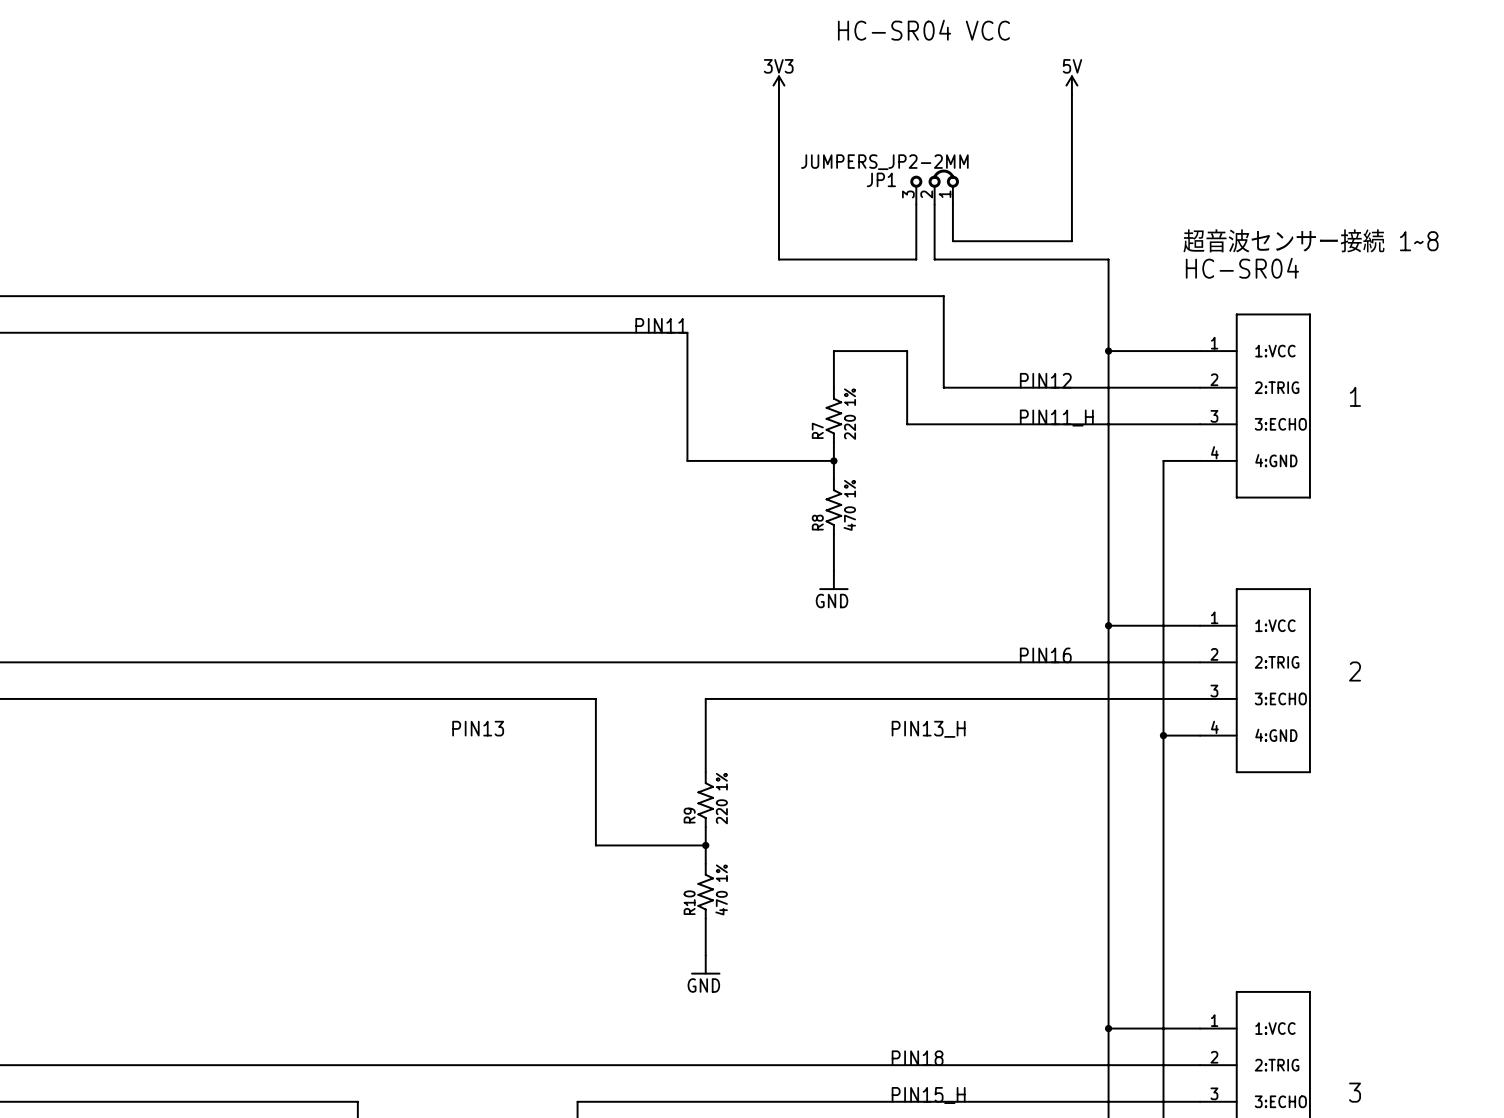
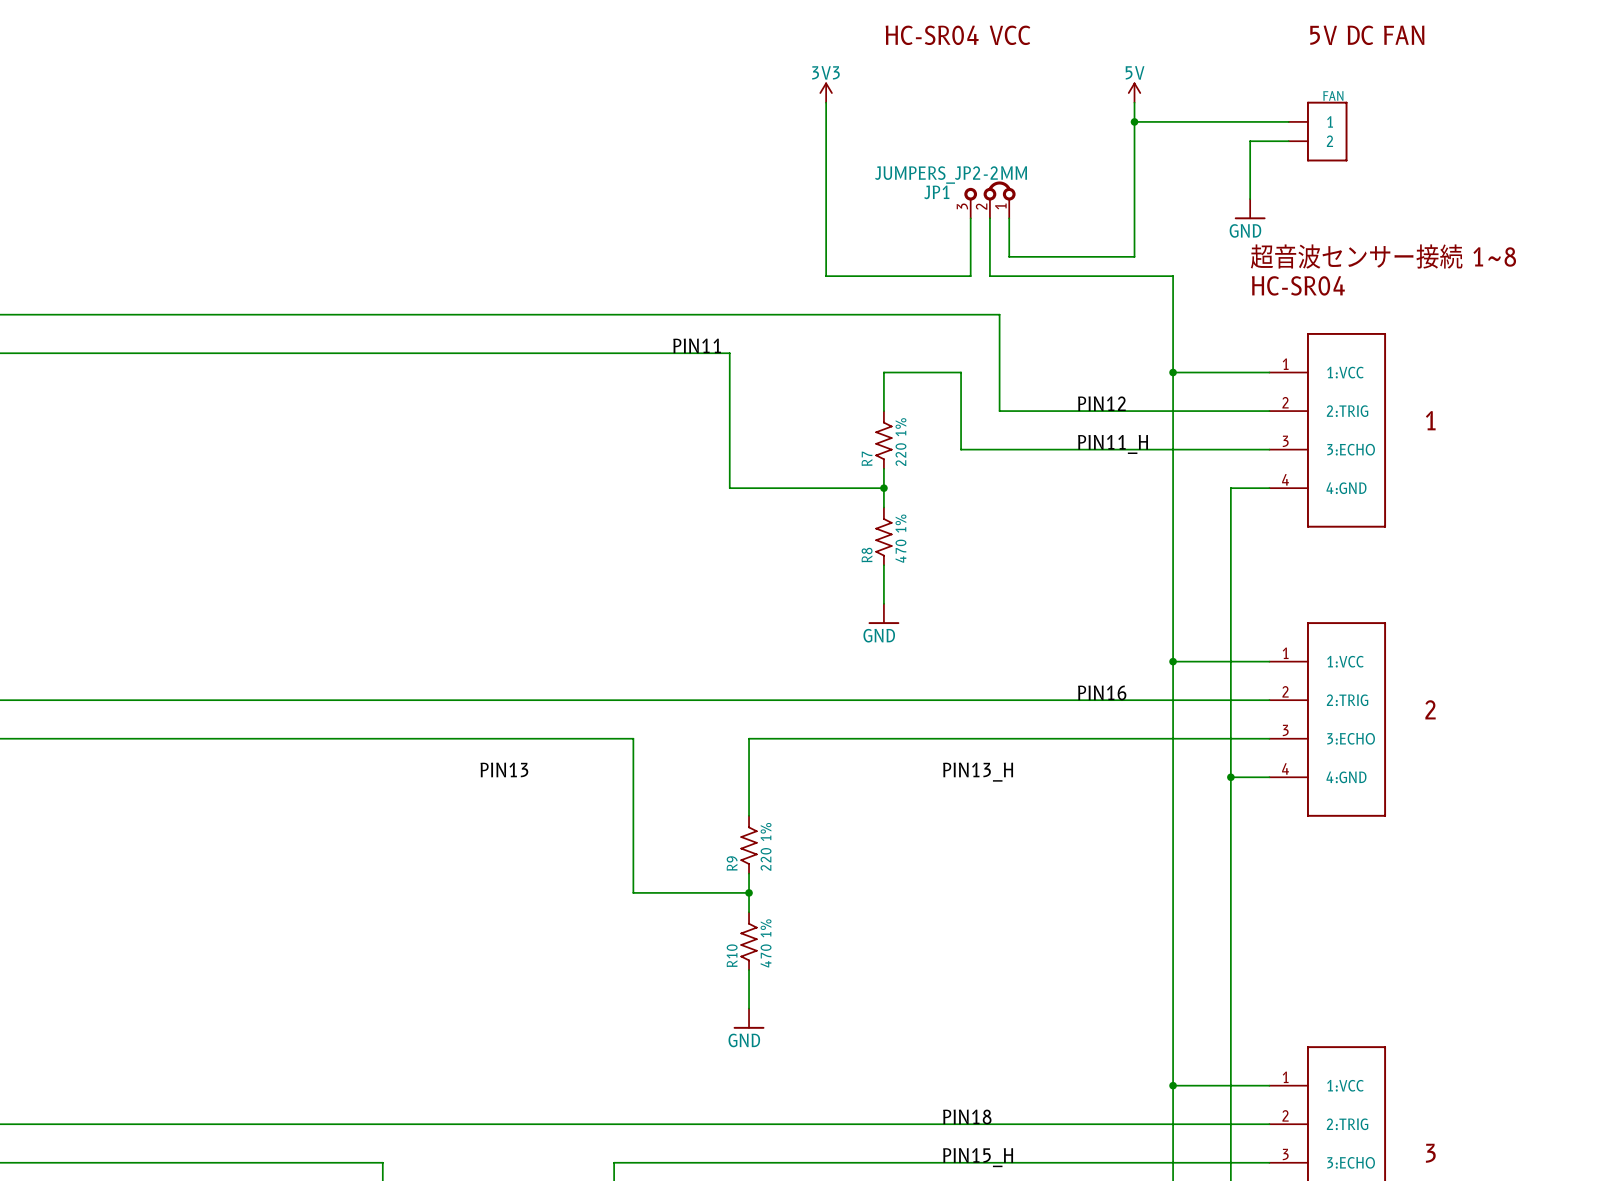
text: none -> 5V DC FAN (1367, 35)
wire: none -> (1134, 121) (1288, 121)
junction: none -> (1134, 121)
FAN: none -> (1318, 131)
wire: none -> (1288, 141) (1250, 141) (1250, 199)
power symbol: none -> GND (1250, 209)

